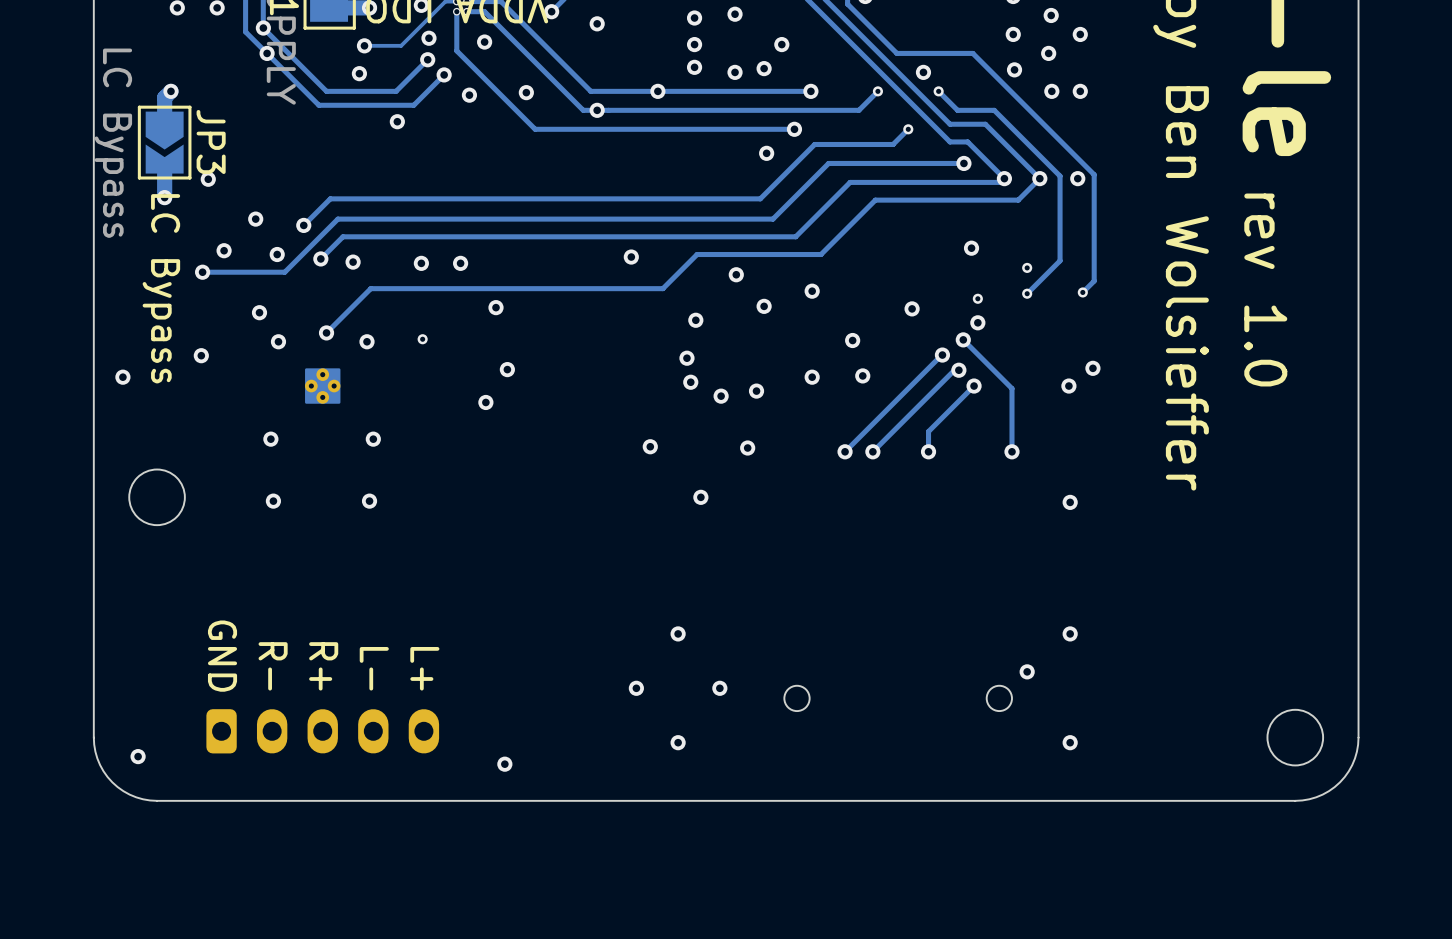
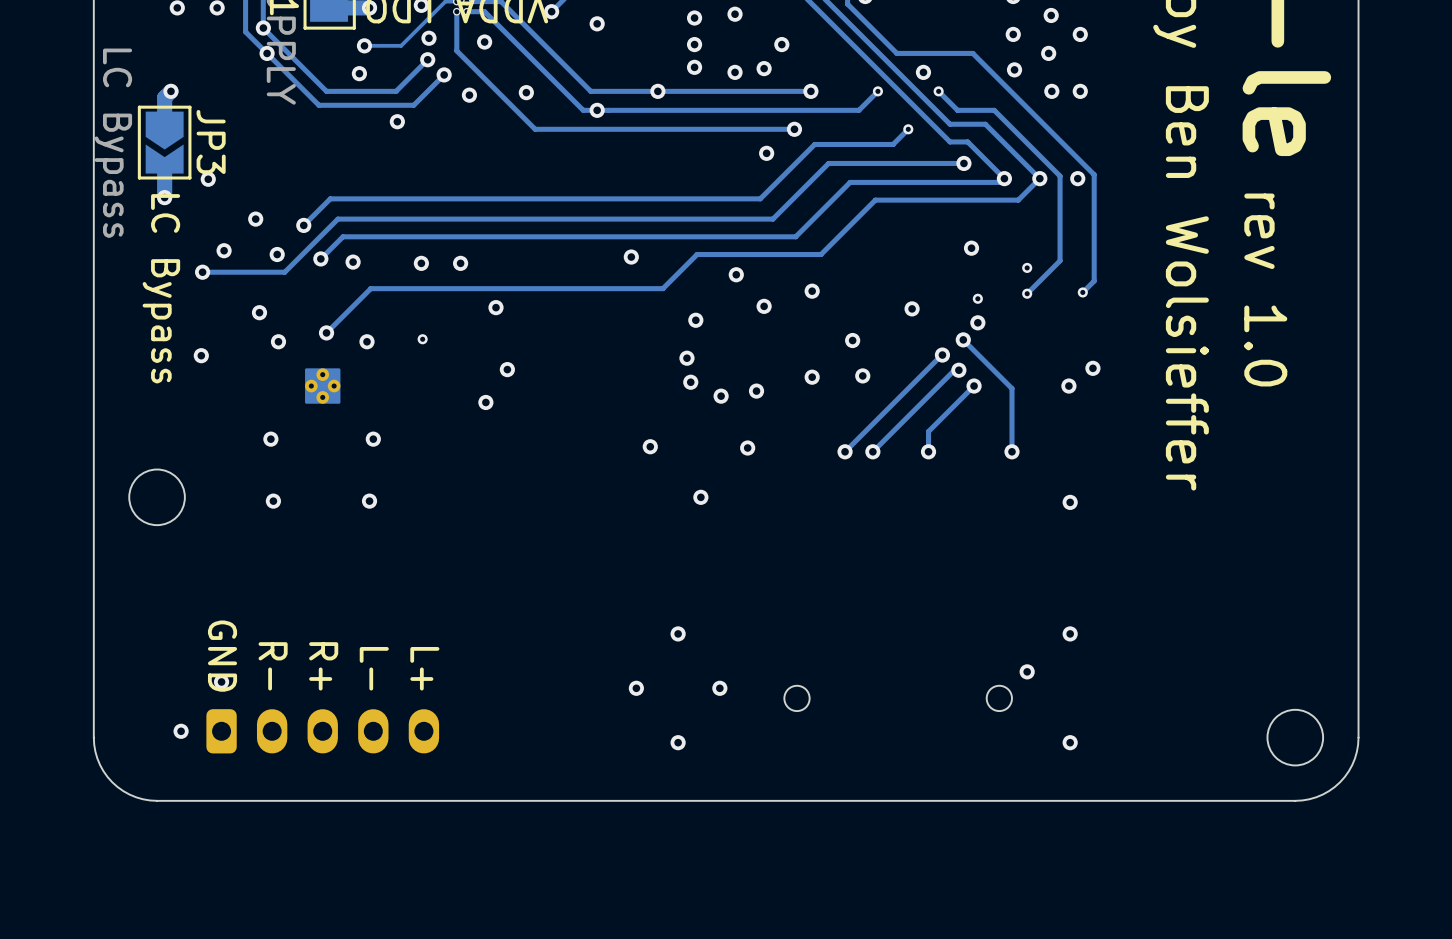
via: (122, 377) -> none
via: none -> (221, 681)
via position: (138, 756) -> (181, 731)
via: (504, 764) -> none

